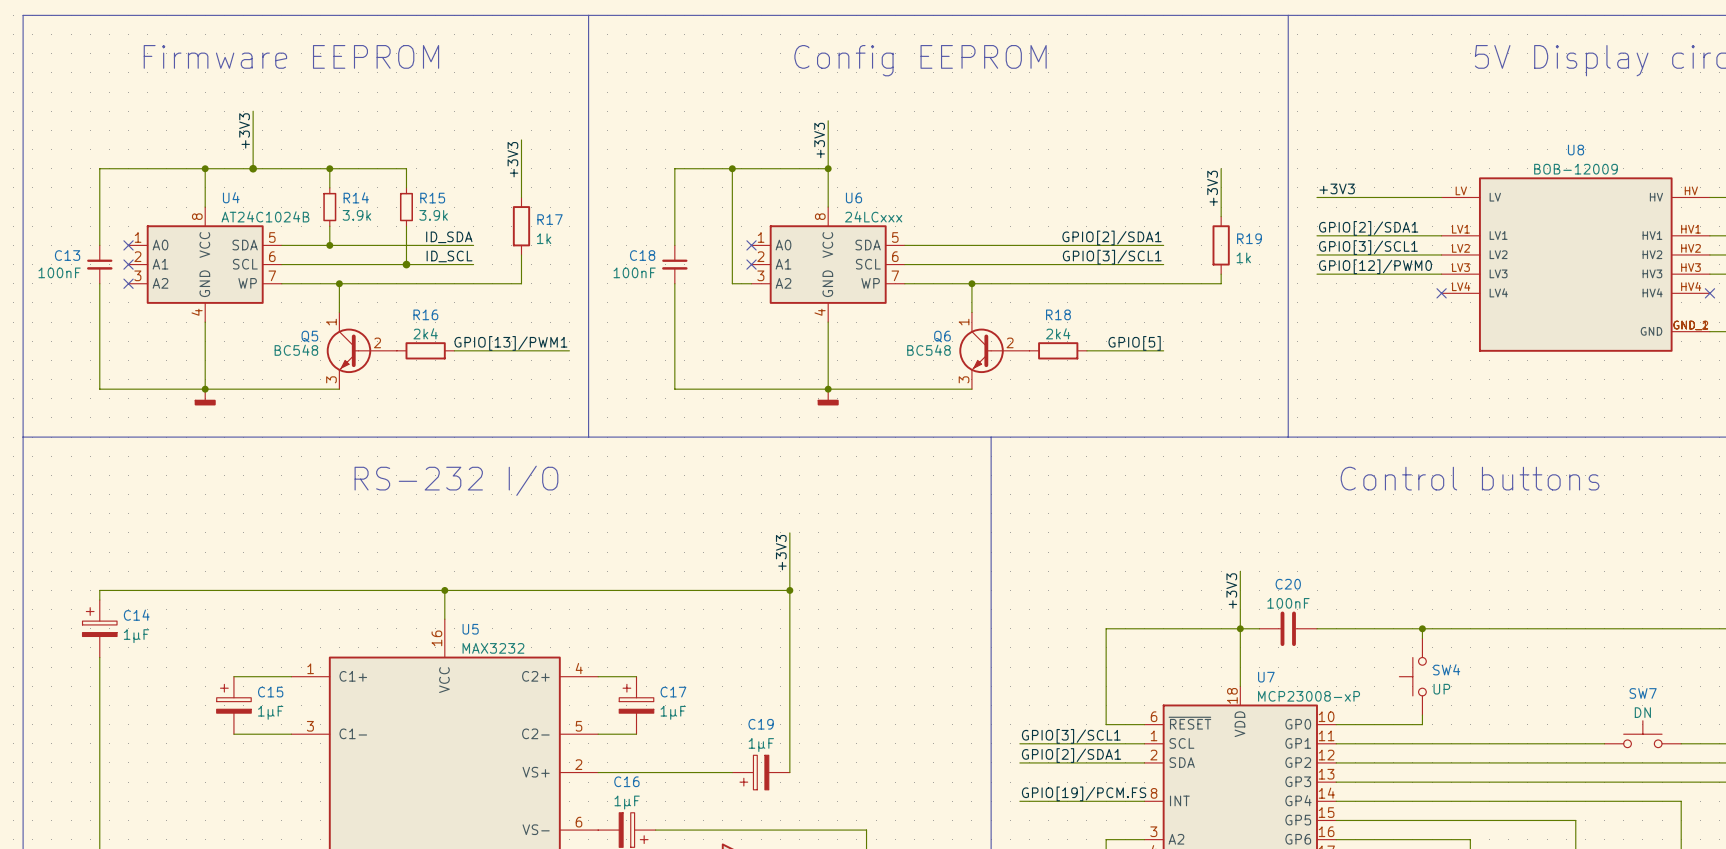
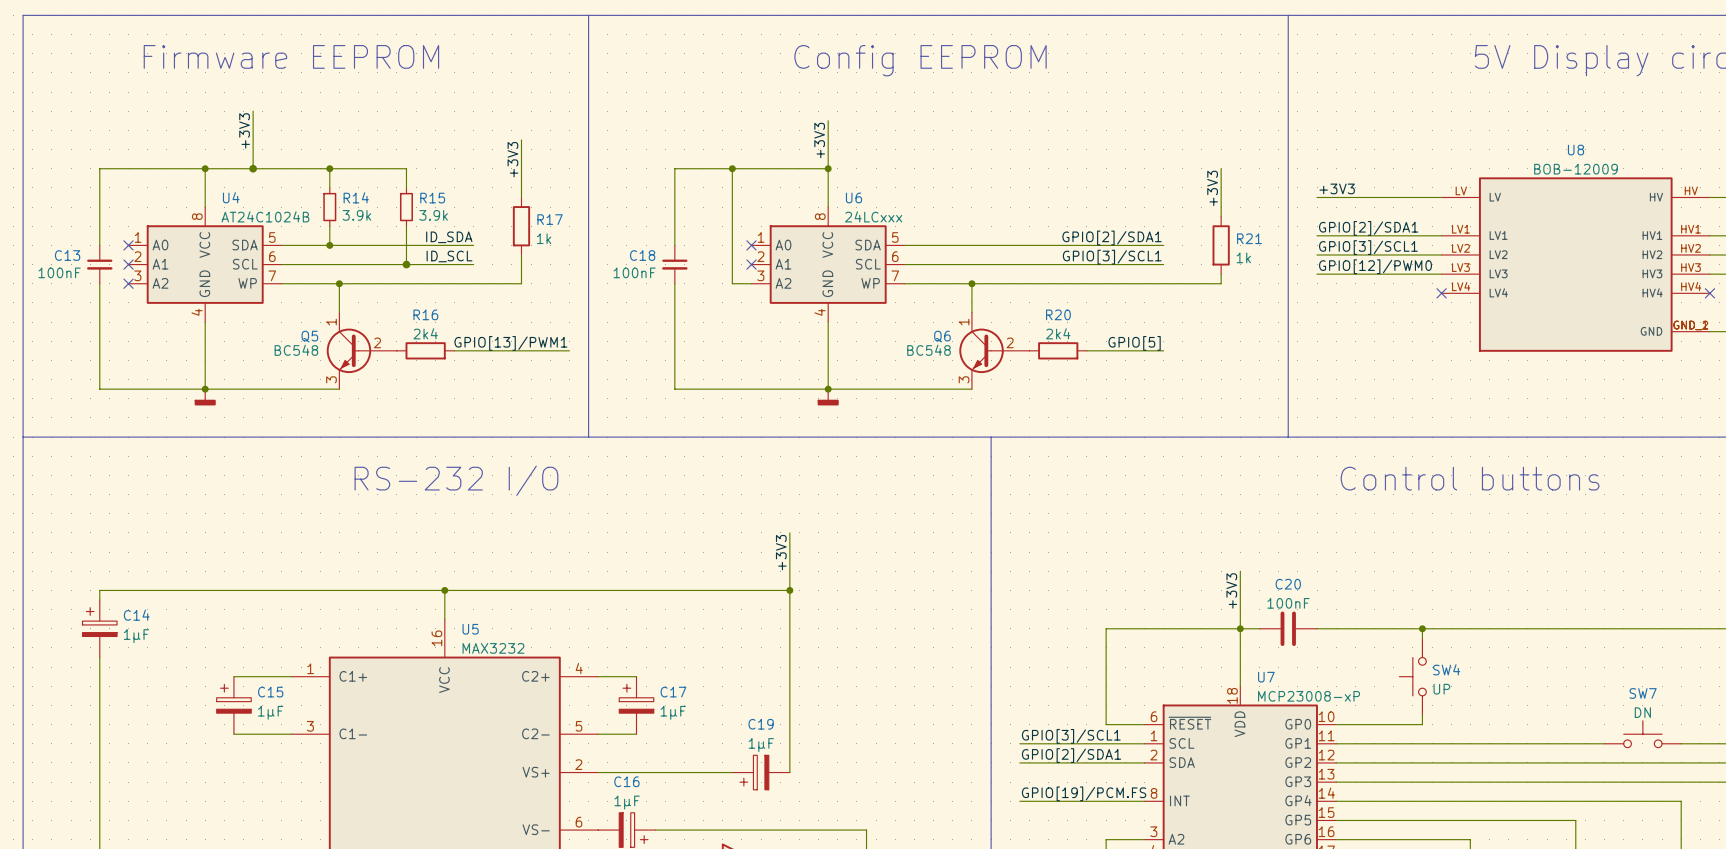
R19 name: R19 (1249, 238) -> R21 (1249, 238)
R18 name: R18 (1058, 314) -> R20 (1058, 314)

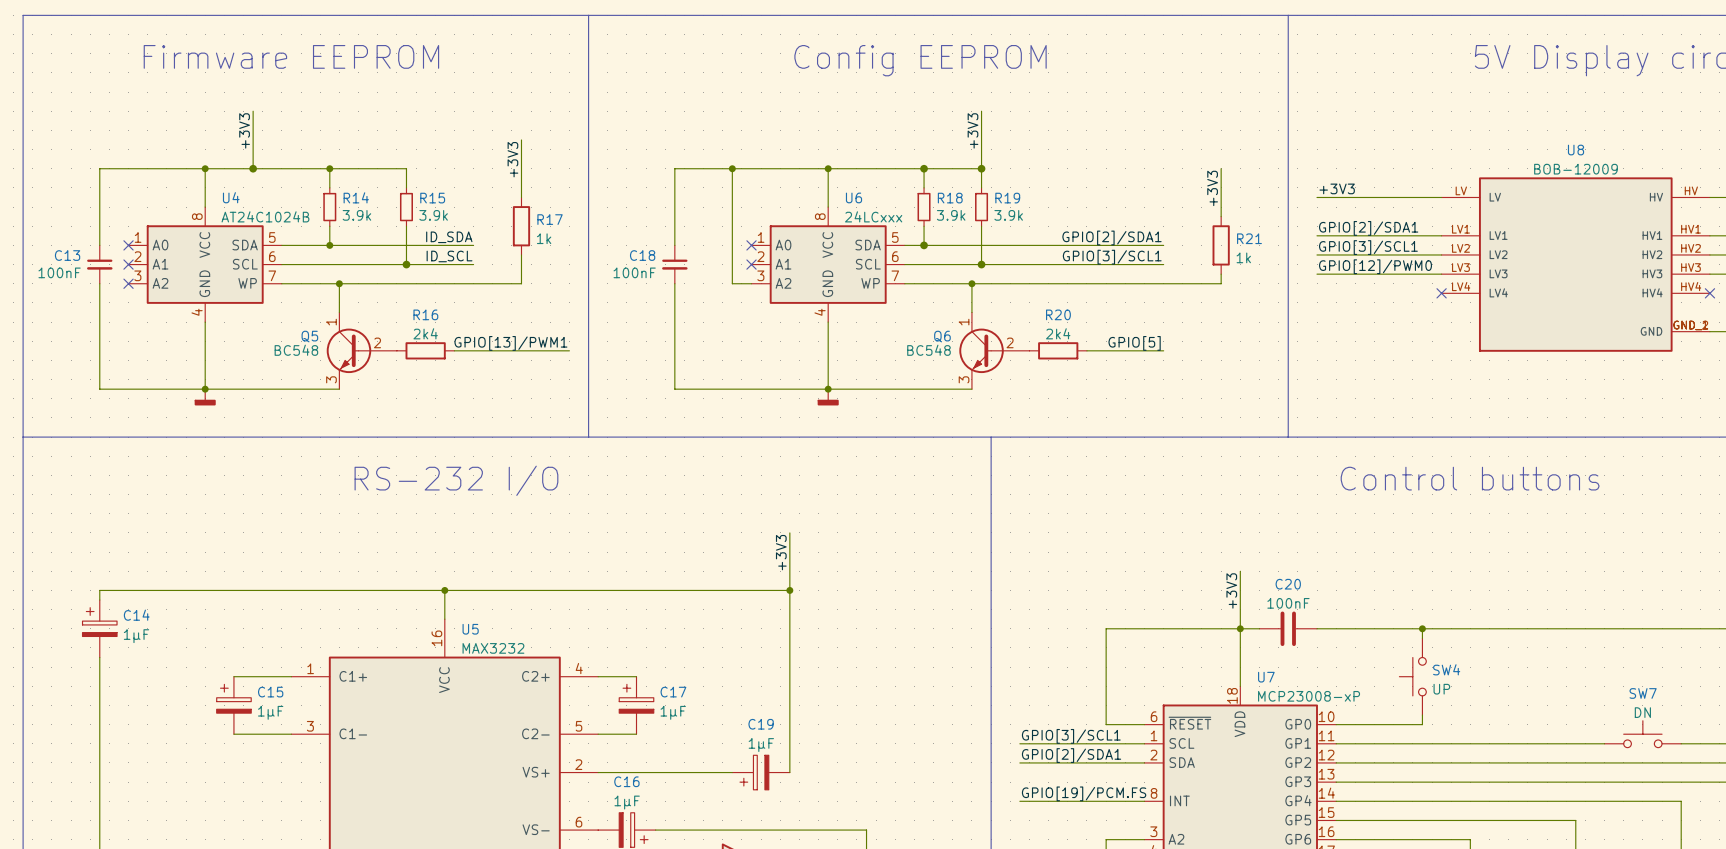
wire: none -> (981, 111) (981, 187)
wire: (828, 120) (828, 168) -> (981, 168) (828, 168)
label position: +3V3 (819, 140) -> +3V3 (972, 130)
wire: none -> (924, 168) (924, 187)
junction: none -> (924, 168)
junction: none -> (981, 168)
R18: none -> 3.9k (924, 207)
R19: none -> 3.9k (981, 207)
wire: none -> (924, 226) (924, 245)
wire: none -> (981, 226) (981, 264)
junction: none -> (924, 245)
junction: none -> (981, 264)

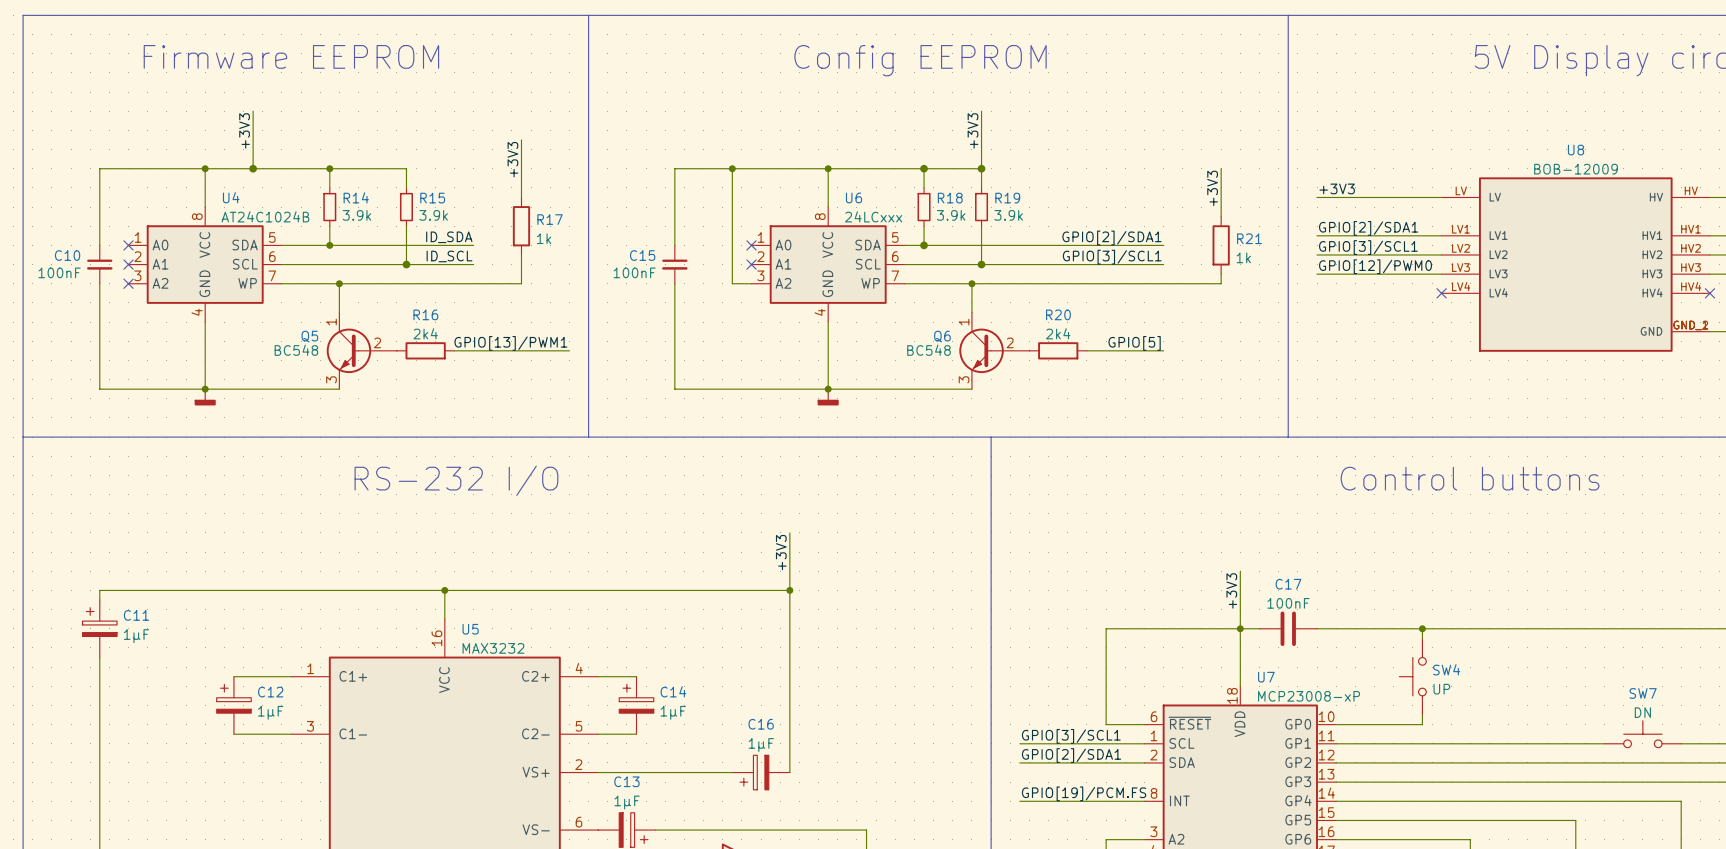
C13 name: C13 (67, 255) -> C10 (67, 255)
C18 name: C18 (642, 255) -> C15 (642, 255)
C20 name: C20 (1288, 584) -> C17 (1288, 584)
C14 name: C14 (136, 615) -> C11 (136, 615)
C15 name: C15 (270, 692) -> C12 (270, 692)
C17 name: C17 (673, 692) -> C14 (673, 691)
C19 name: C19 (761, 724) -> C16 (761, 724)
C16 name: C16 (626, 781) -> C13 (626, 781)

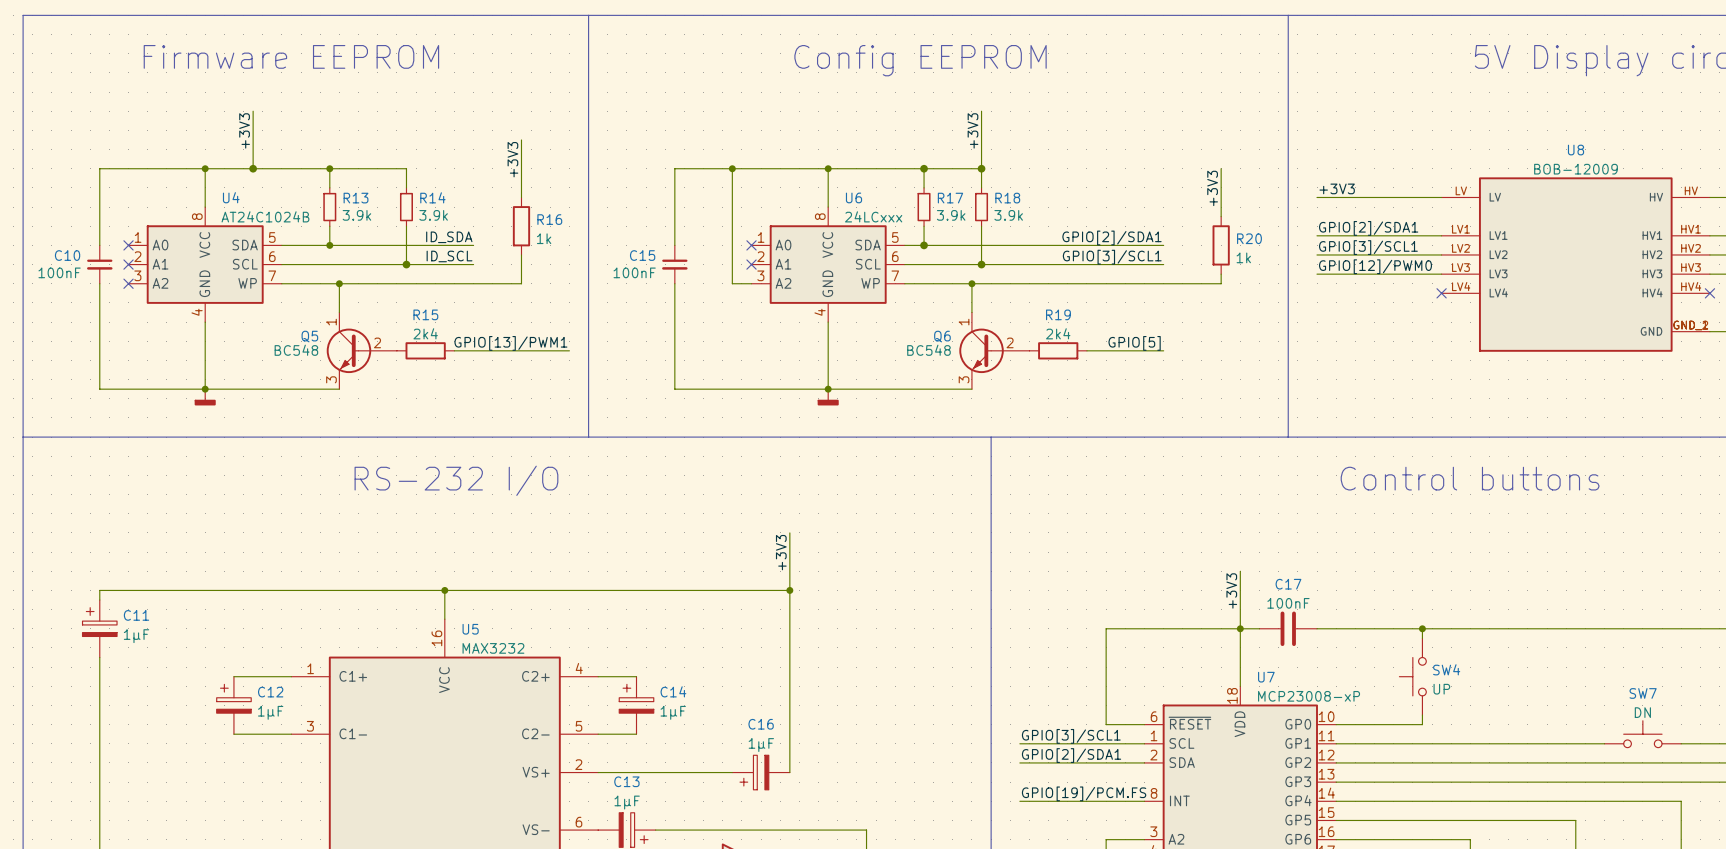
R14 name: R14 (356, 197) -> R13 (356, 198)
R15 name: R15 (432, 198) -> R14 (432, 197)
R18 name: R18 (950, 198) -> R17 (950, 198)
R19 name: R19 (1007, 198) -> R18 (1007, 198)
R17 name: R17 (550, 219) -> R16 (549, 219)
R21 name: R21 (1249, 238) -> R20 (1249, 238)
R16 name: R16 (425, 314) -> R15 (425, 314)
R20 name: R20 (1058, 314) -> R19 (1058, 314)

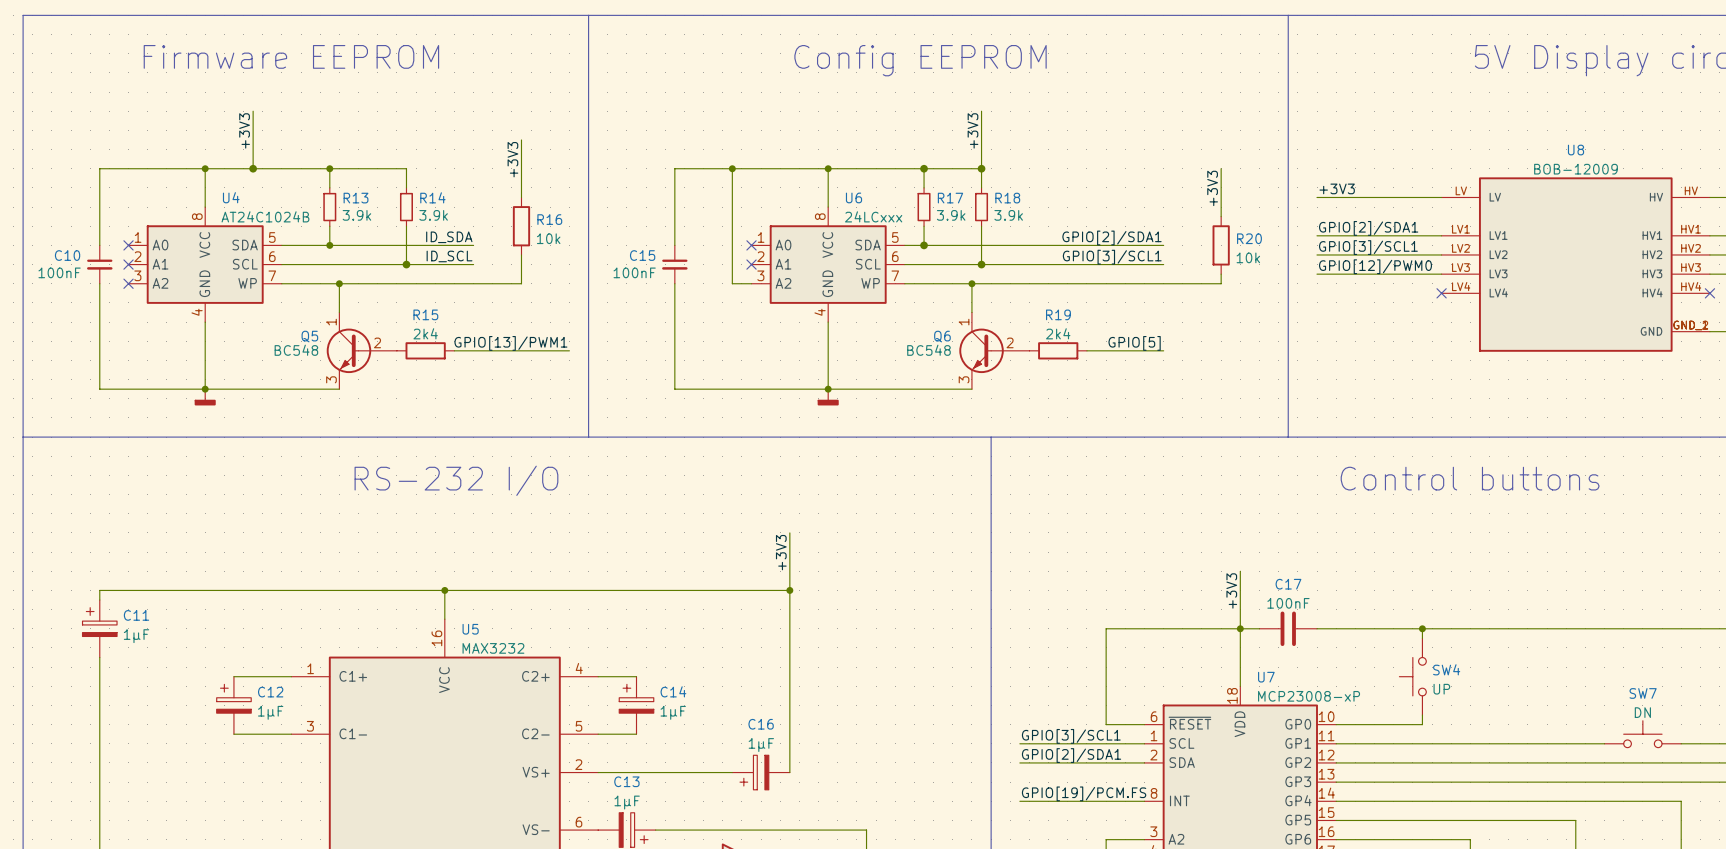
R16 value: 1k (544, 238) -> 10k (548, 238)
R20 value: 1k (1243, 257) -> 10k (1248, 257)

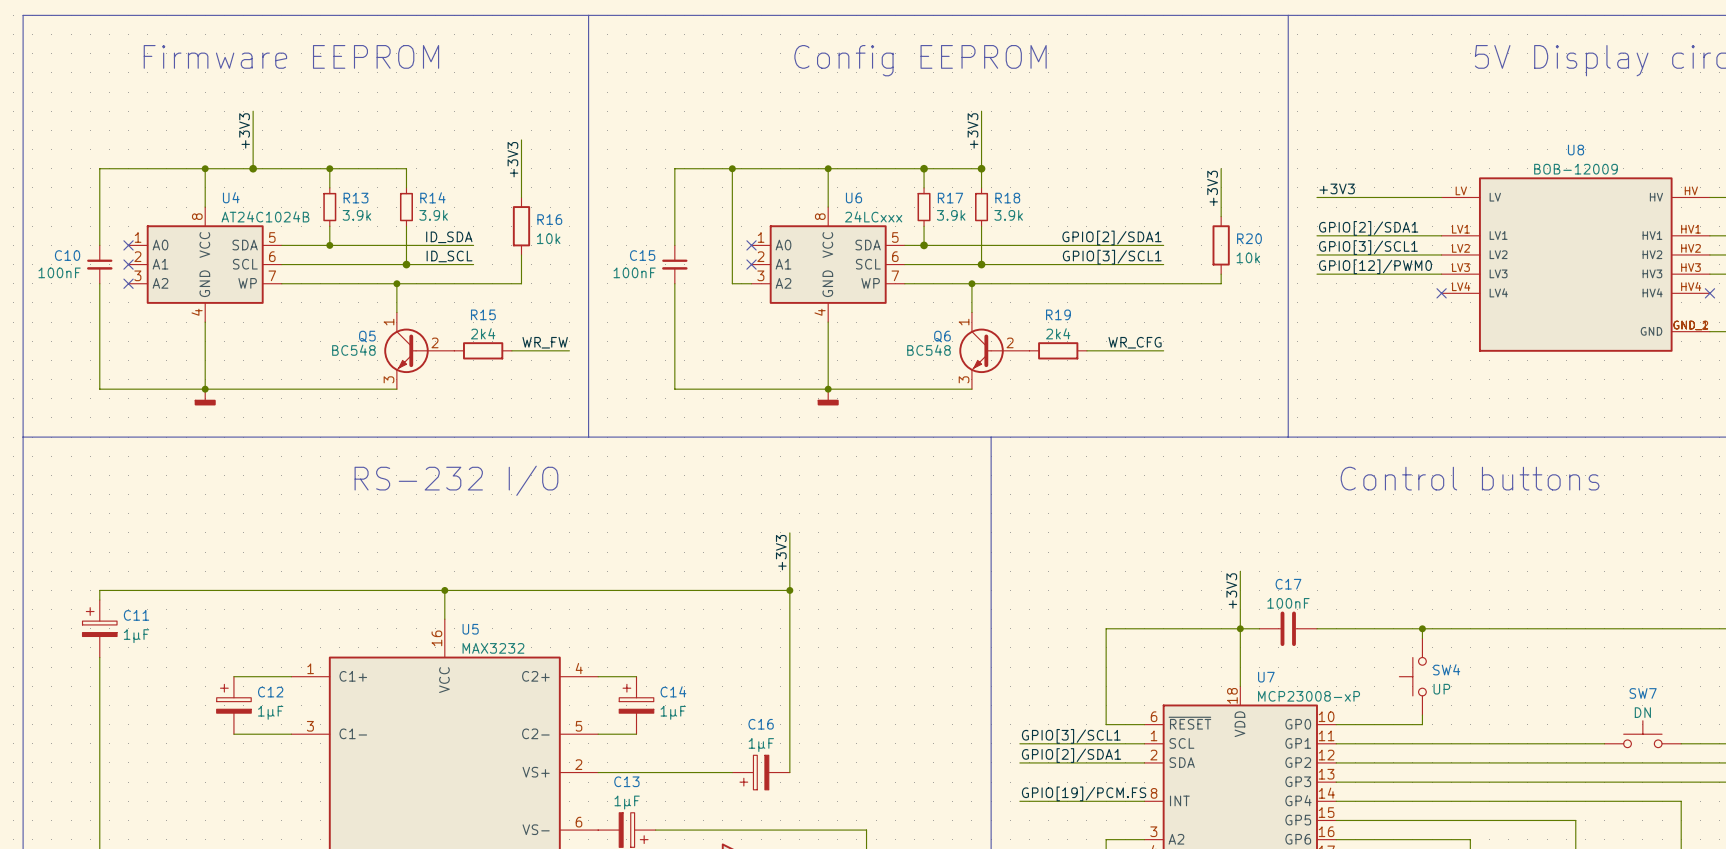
wire: (339, 283) (339, 312) -> (396, 283) (396, 312)
junction: (339, 283) -> none
junction: none -> (396, 283)
label: GPIO[13]/PWM1 (510, 343) -> WR_FW (545, 342)
label: GPIO[5] (1134, 343) -> WR_CFG (1135, 342)
Q5 position: (361, 350) -> (419, 350)
R15 position: (425, 350) -> (483, 350)
wire: (454, 350) (511, 350) -> (339, 389) (396, 389)

